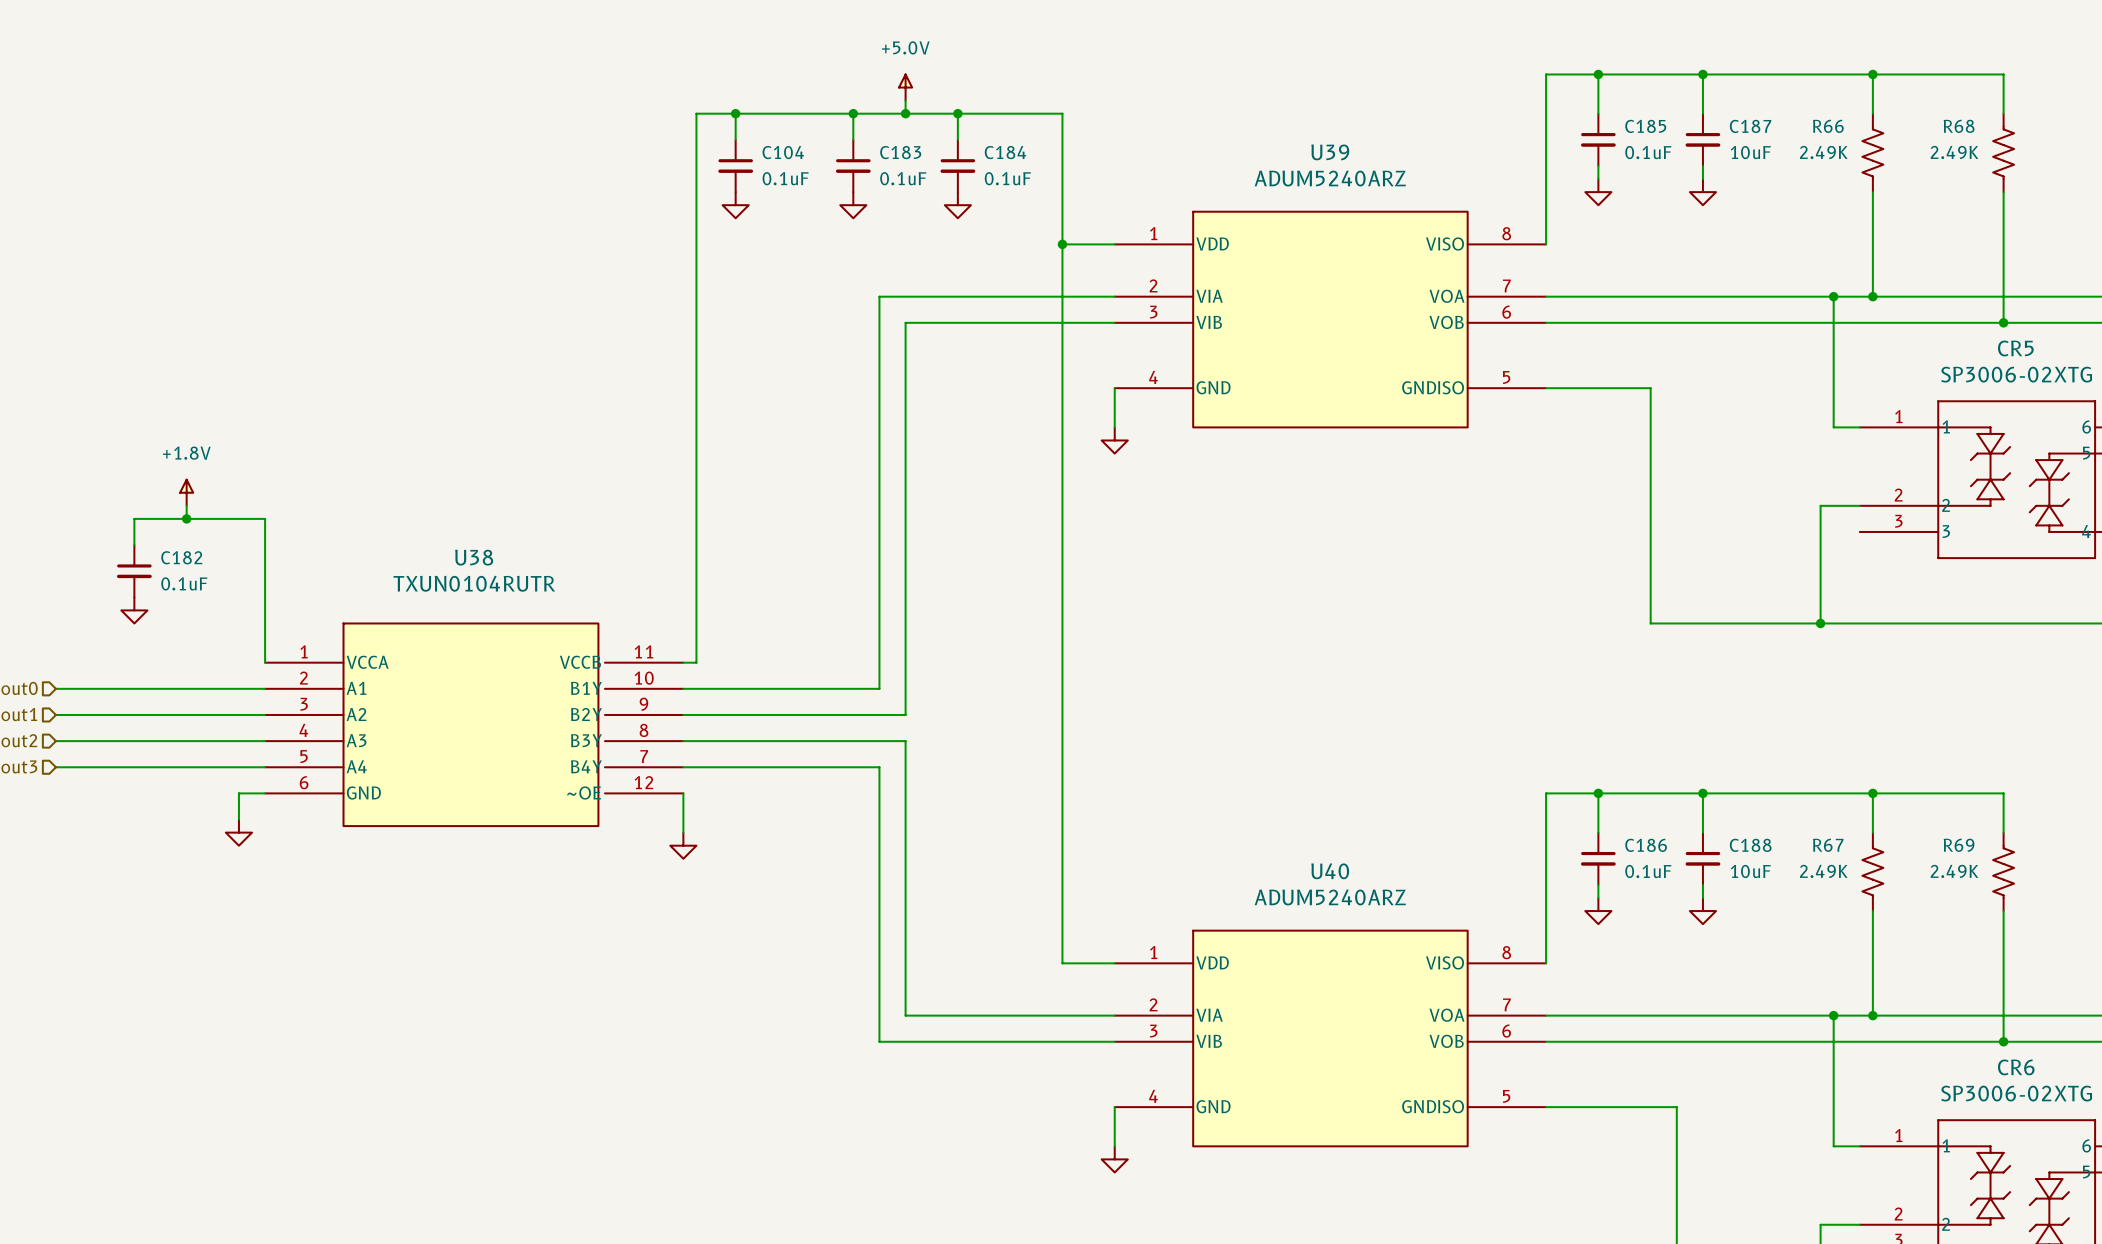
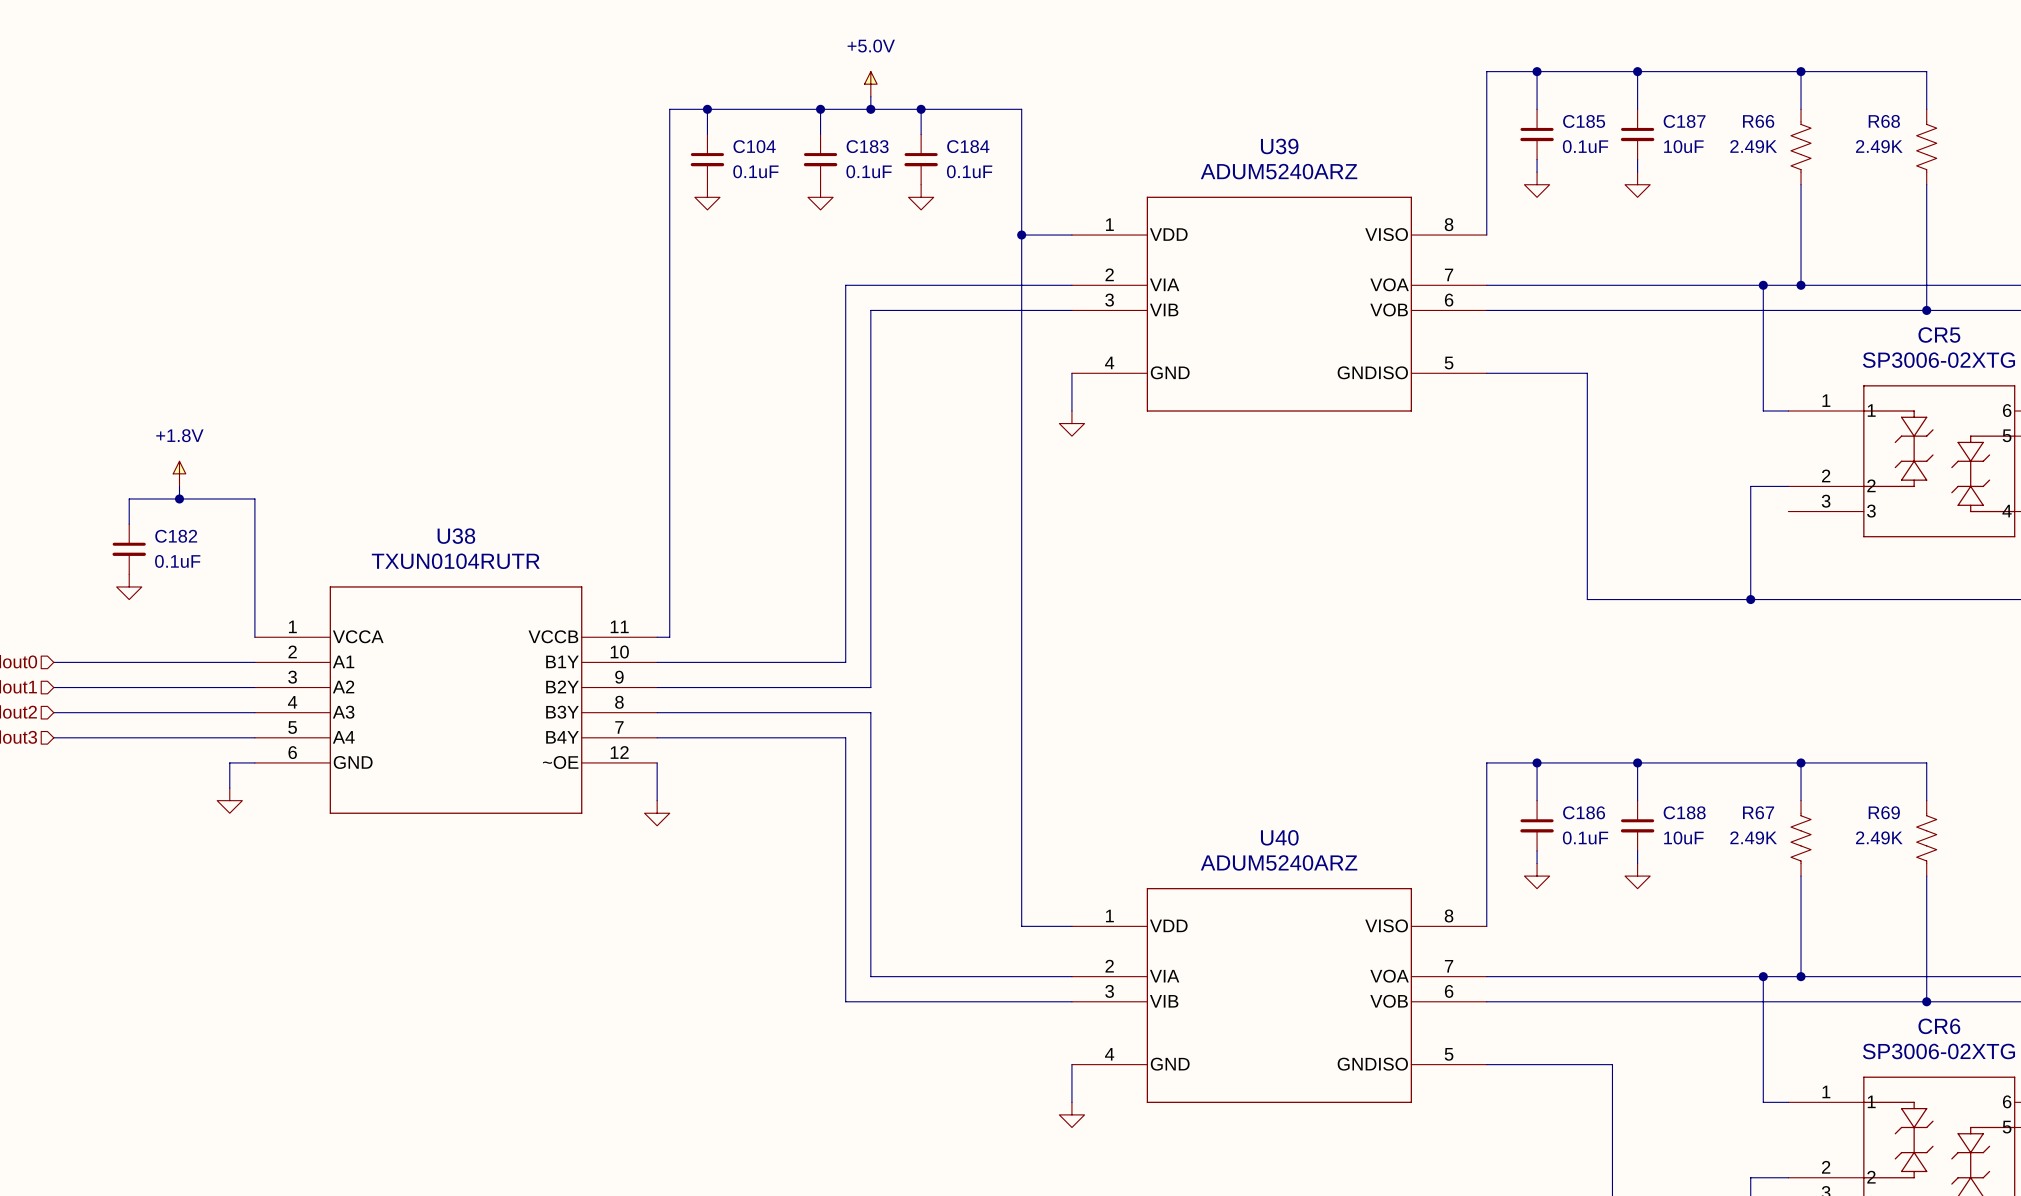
U39 symbol: [1114, 211, 1547, 428] -> [1071, 196, 1487, 412]
U38 symbol: [265, 623, 684, 827] -> [254, 586, 658, 814]
U40 symbol: [1114, 930, 1547, 1147] -> [1071, 888, 1487, 1103]

